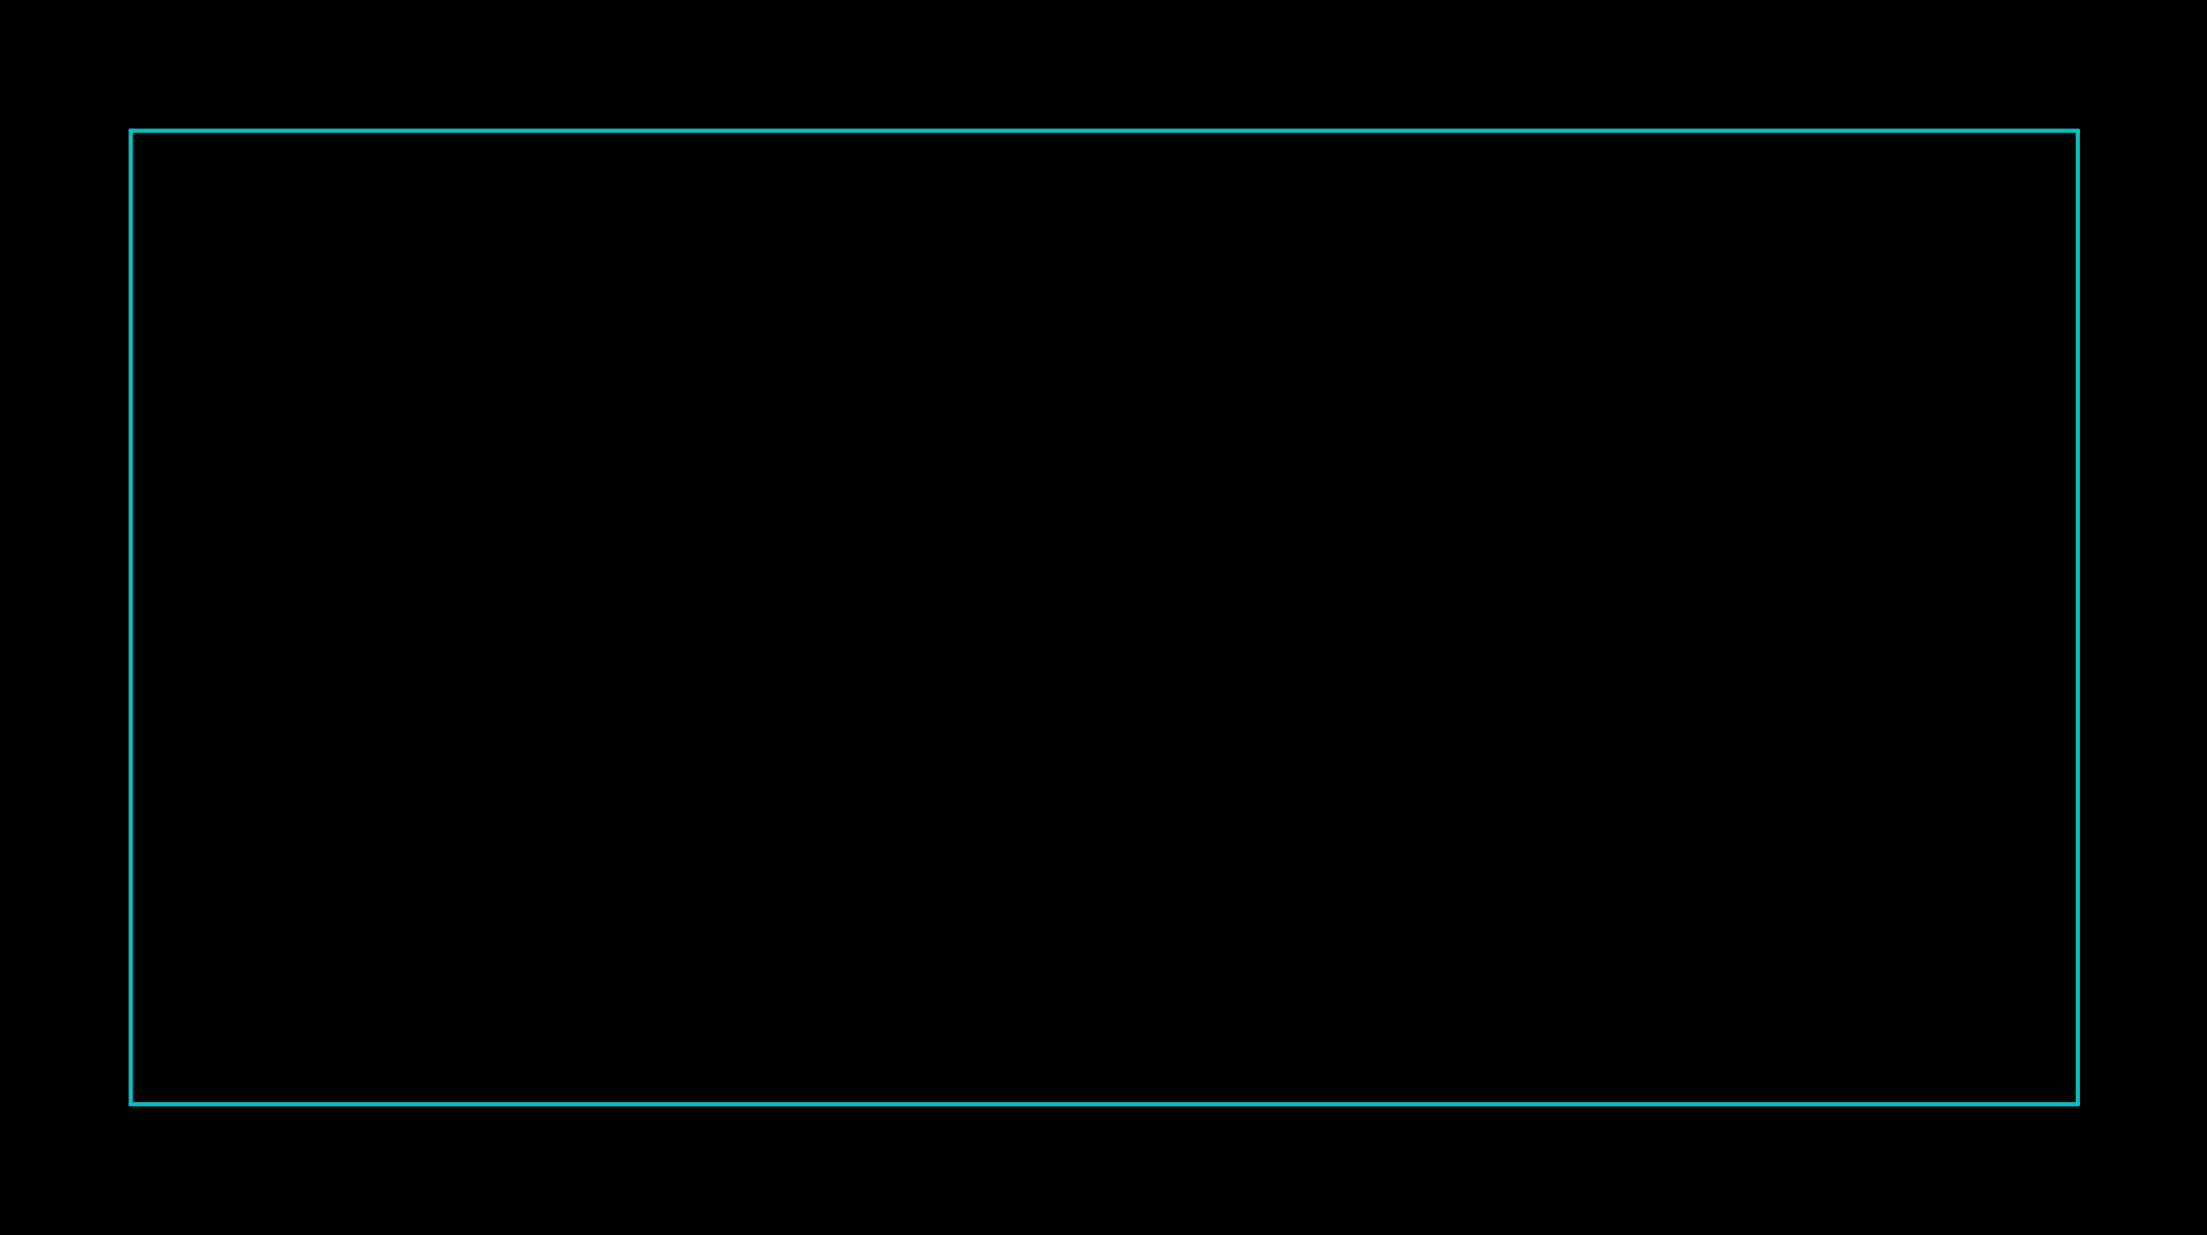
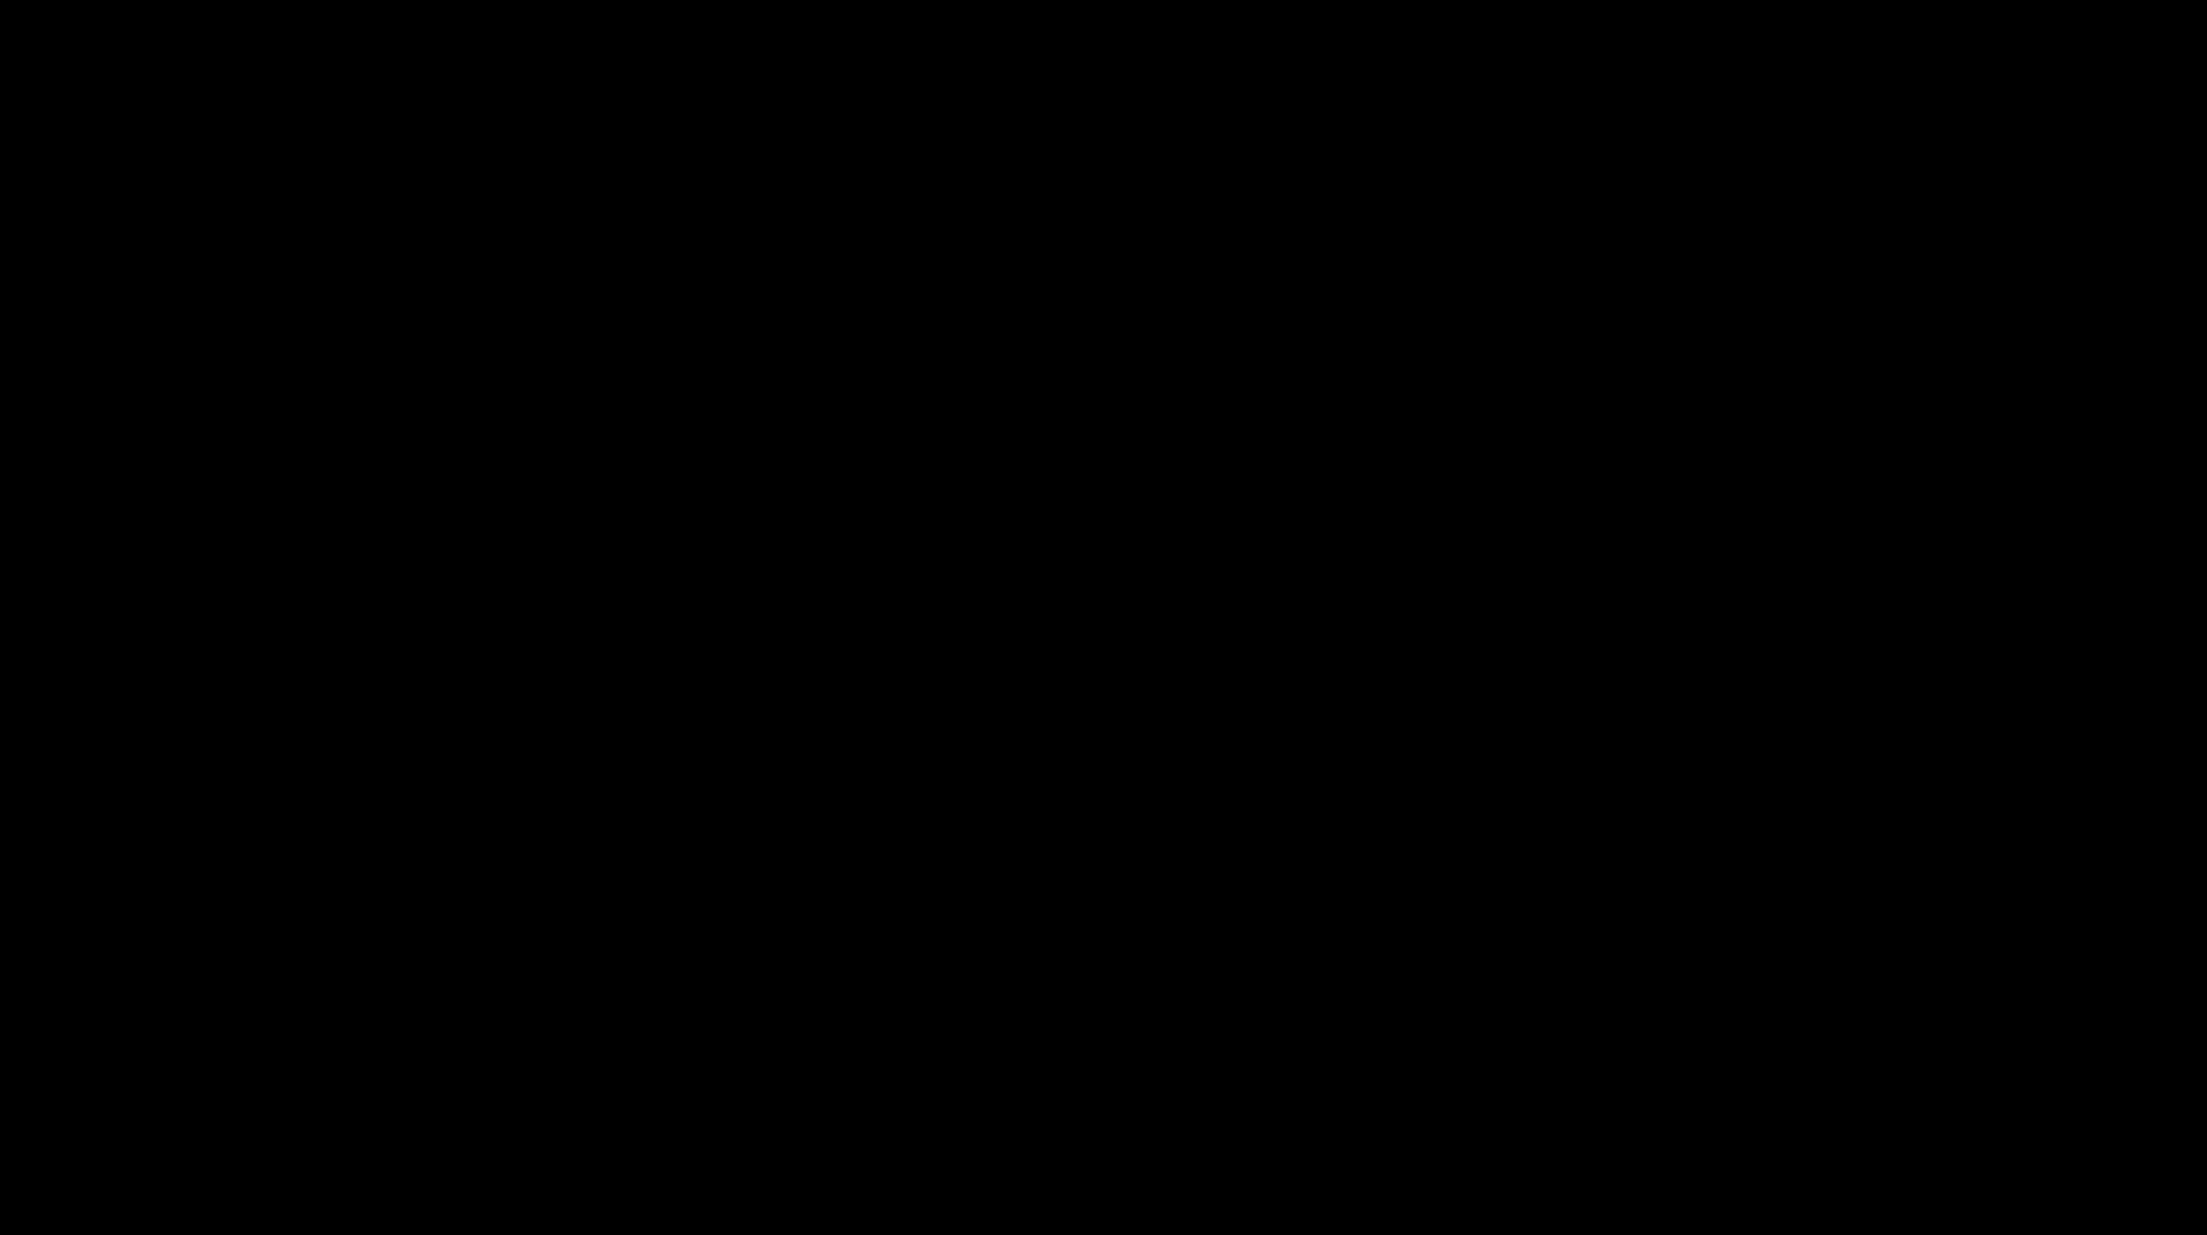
line: (130, 130) (2077, 130) (2077, 1104) (130, 1104) (130, 130) -> none

